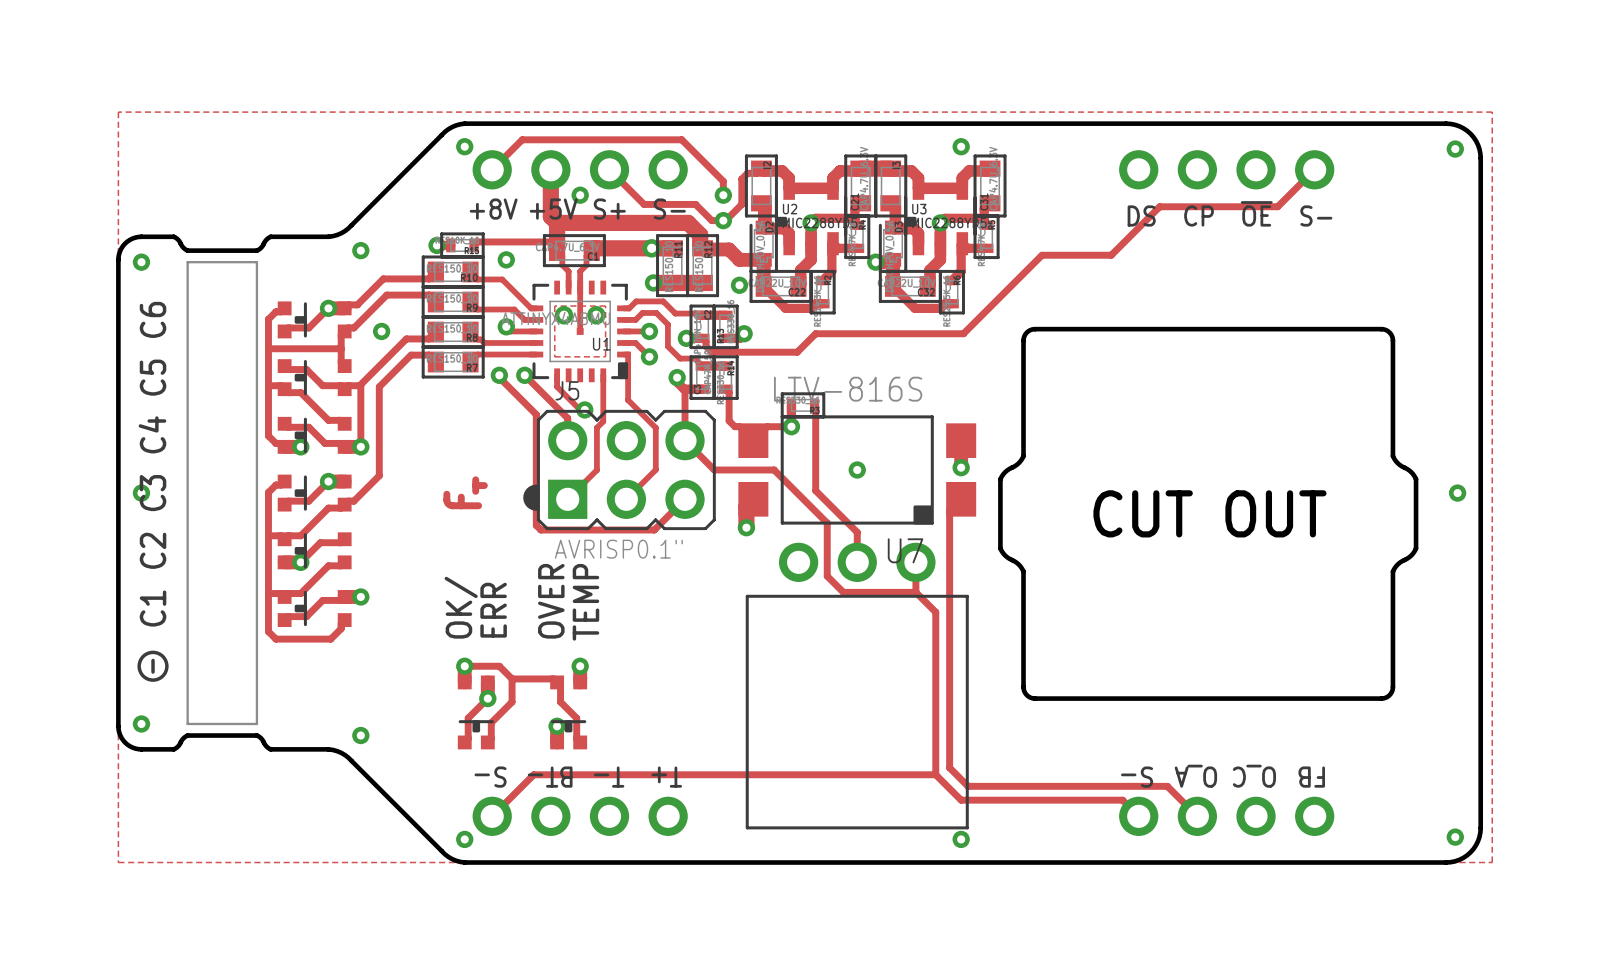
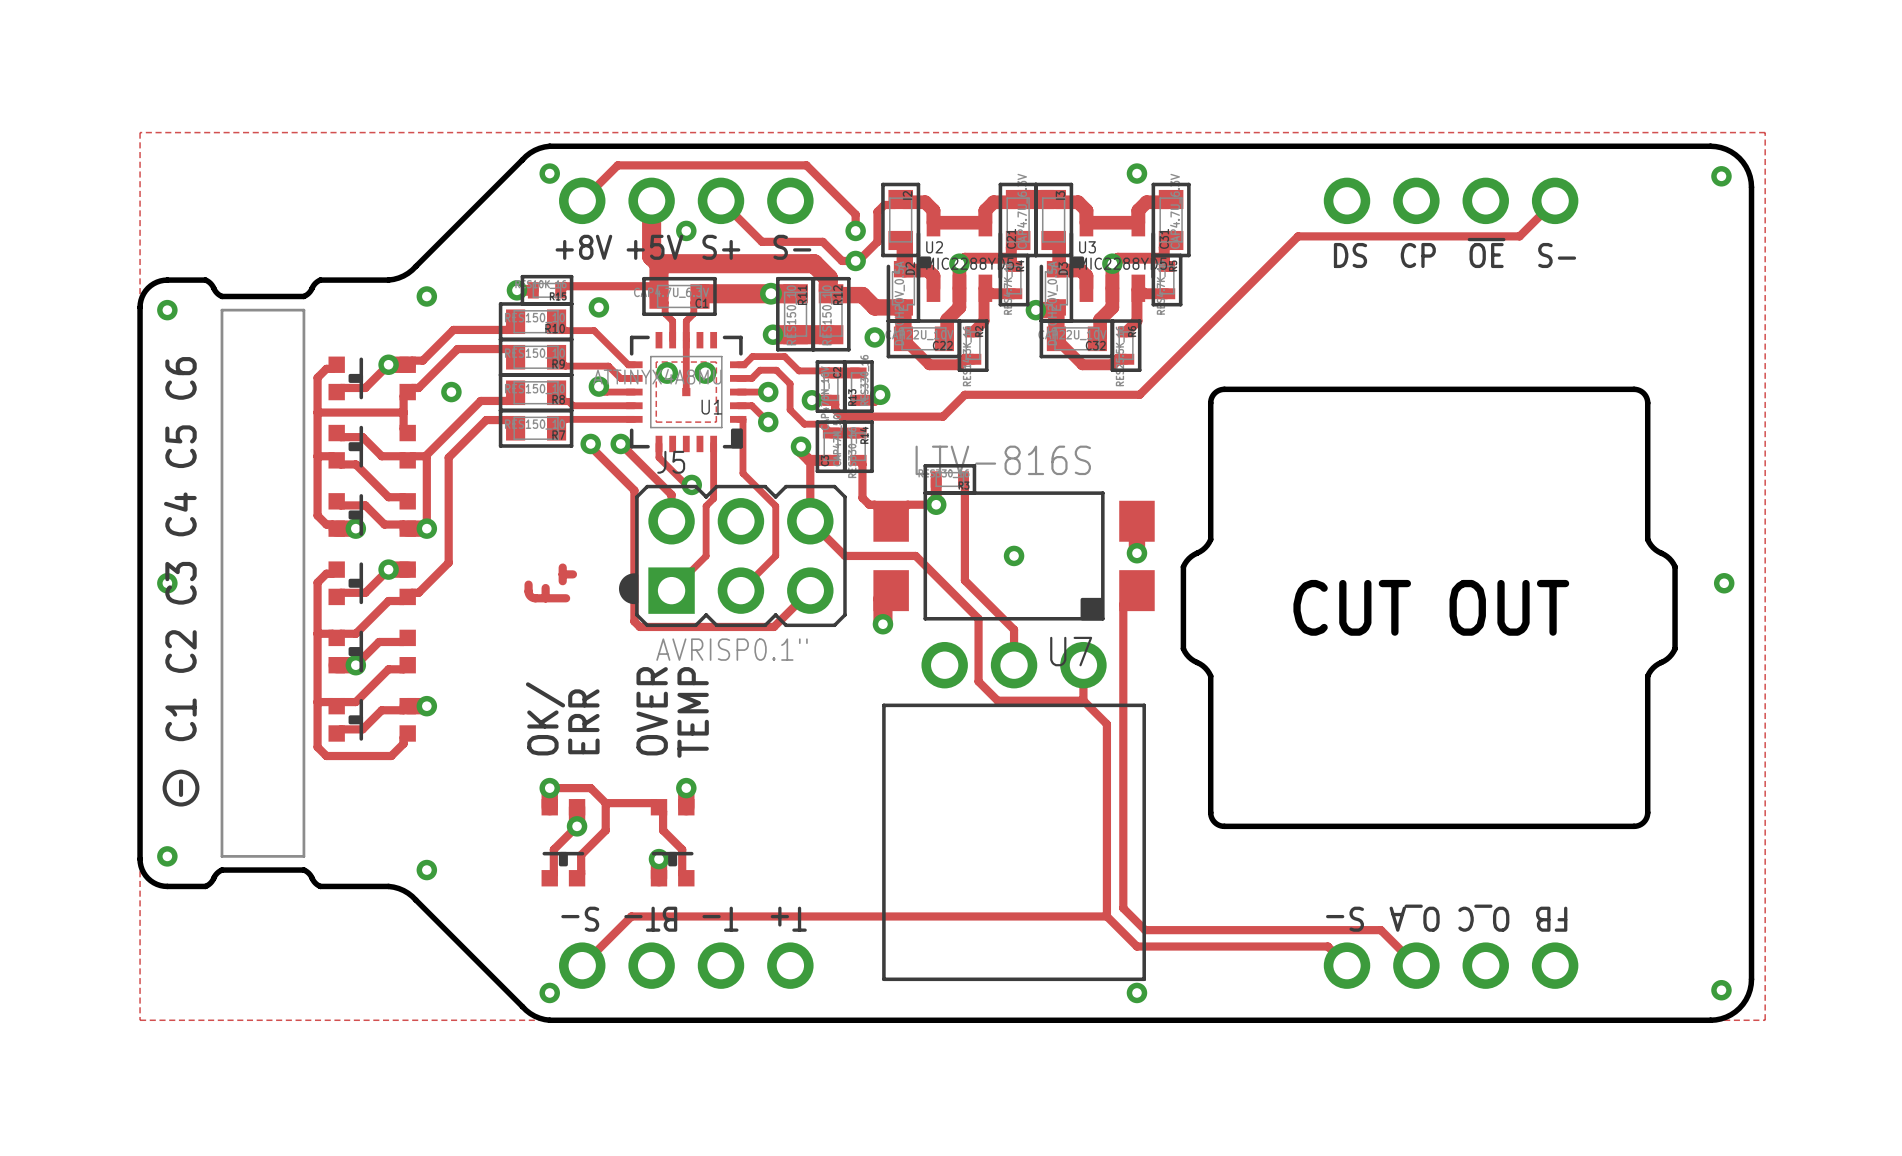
track: (1284, 199) (1277, 206) (1159, 206) (1111, 255) (1041, 255) -> (1519, 236) (1298, 236) (1232, 301)

